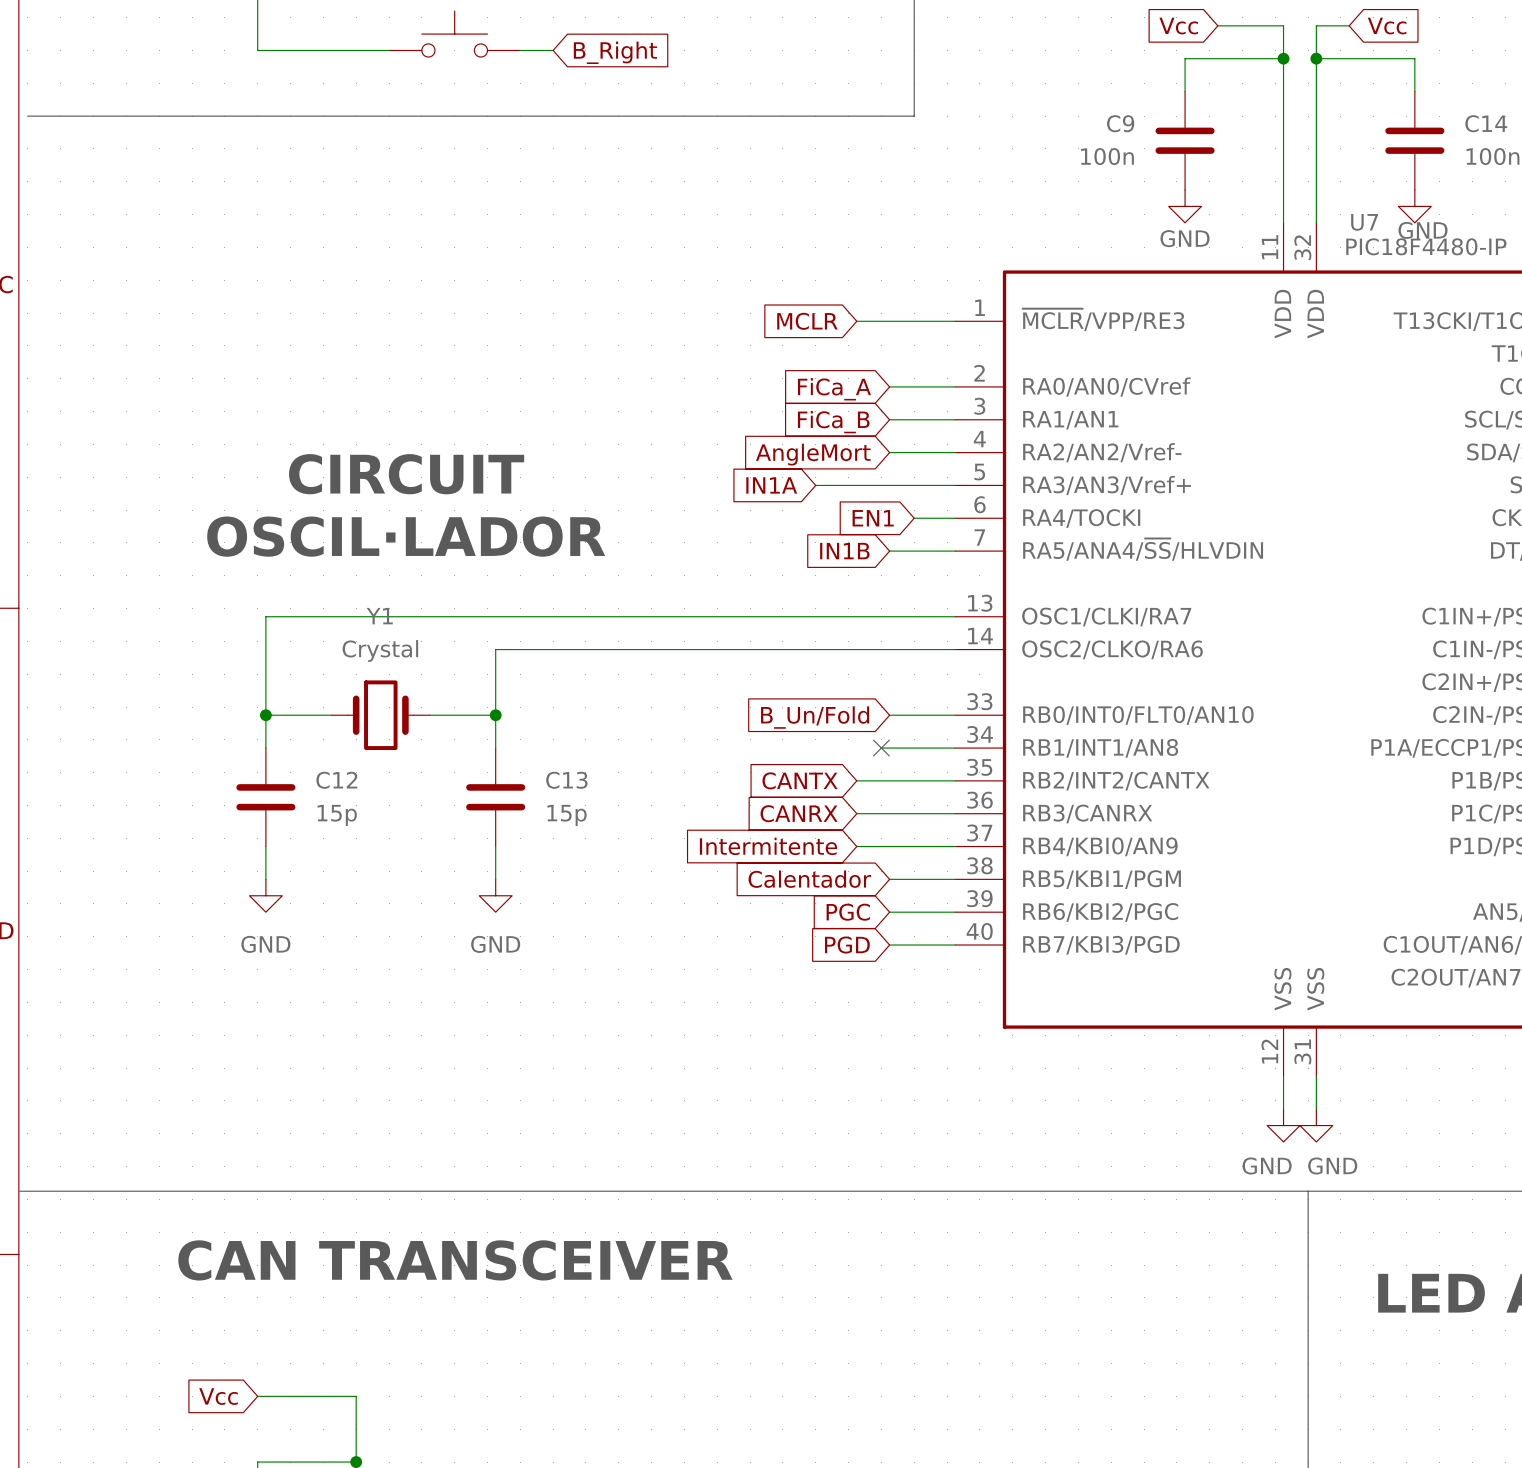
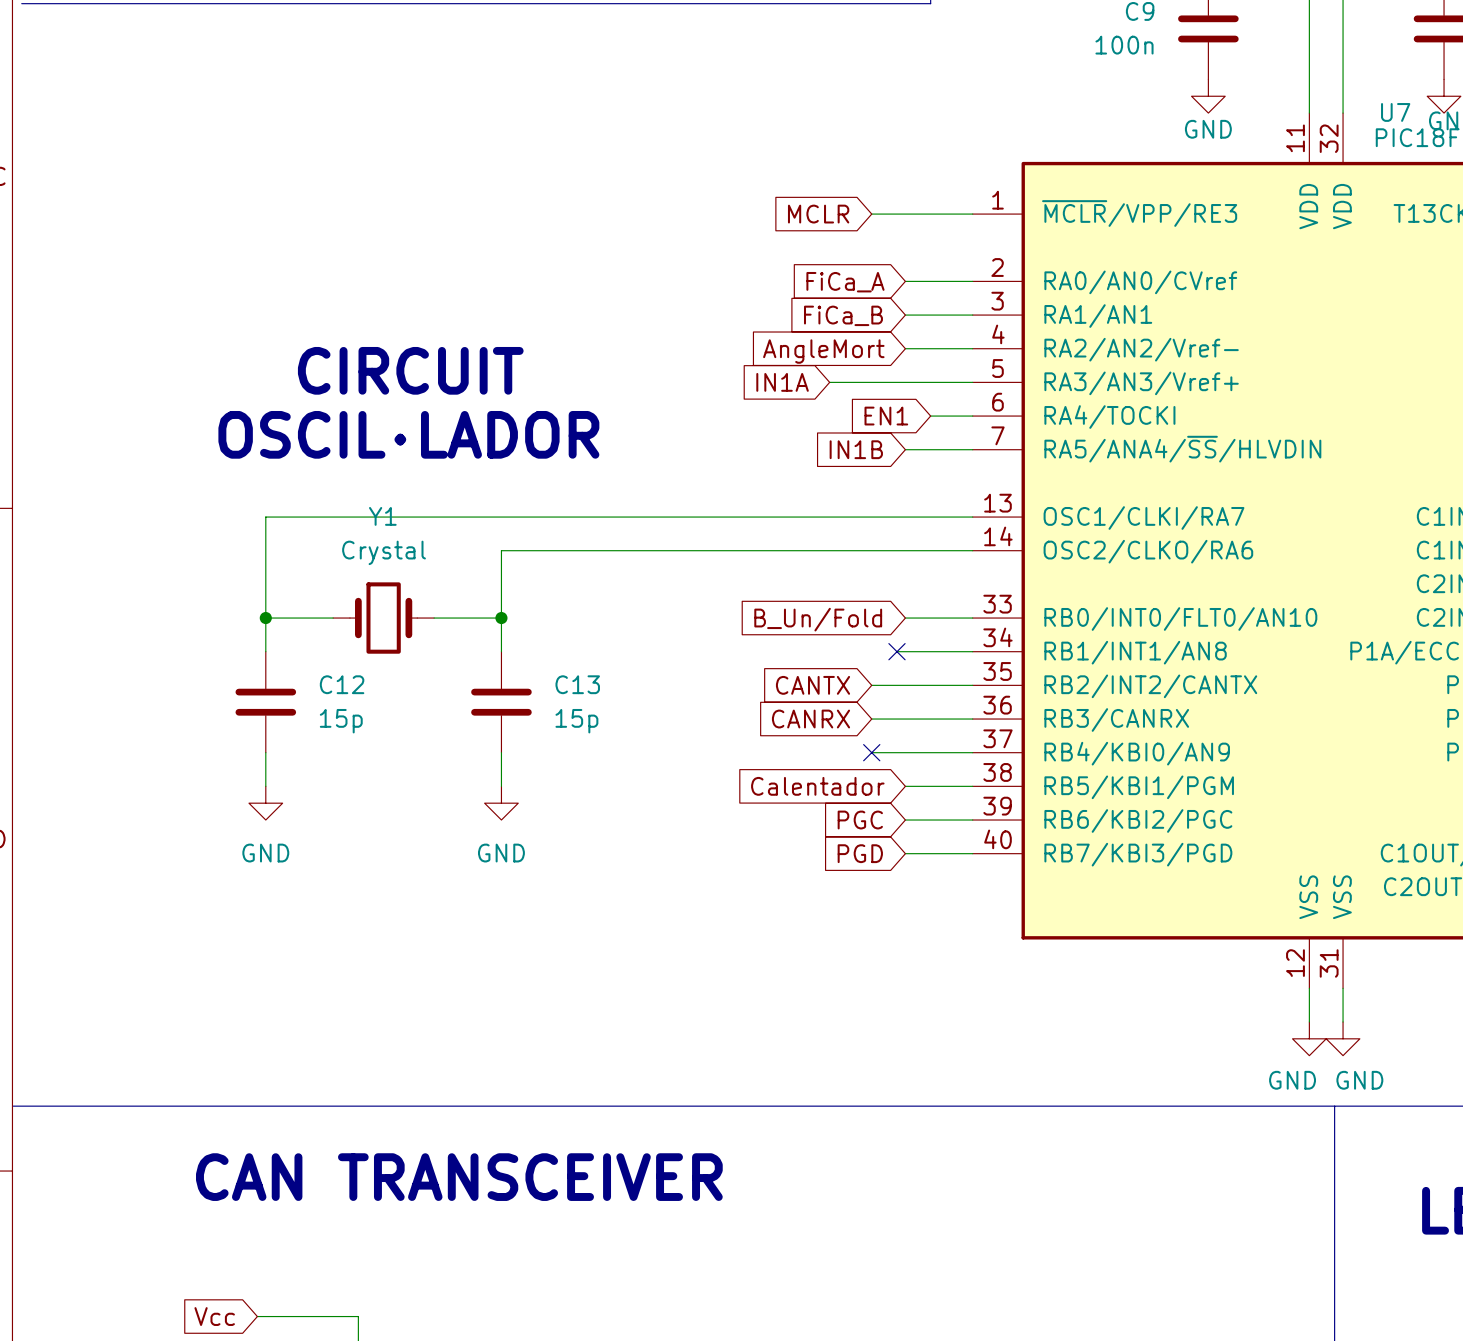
global label: Intermitente (768, 846) -> none
no-connect mark: none -> (871, 752)

